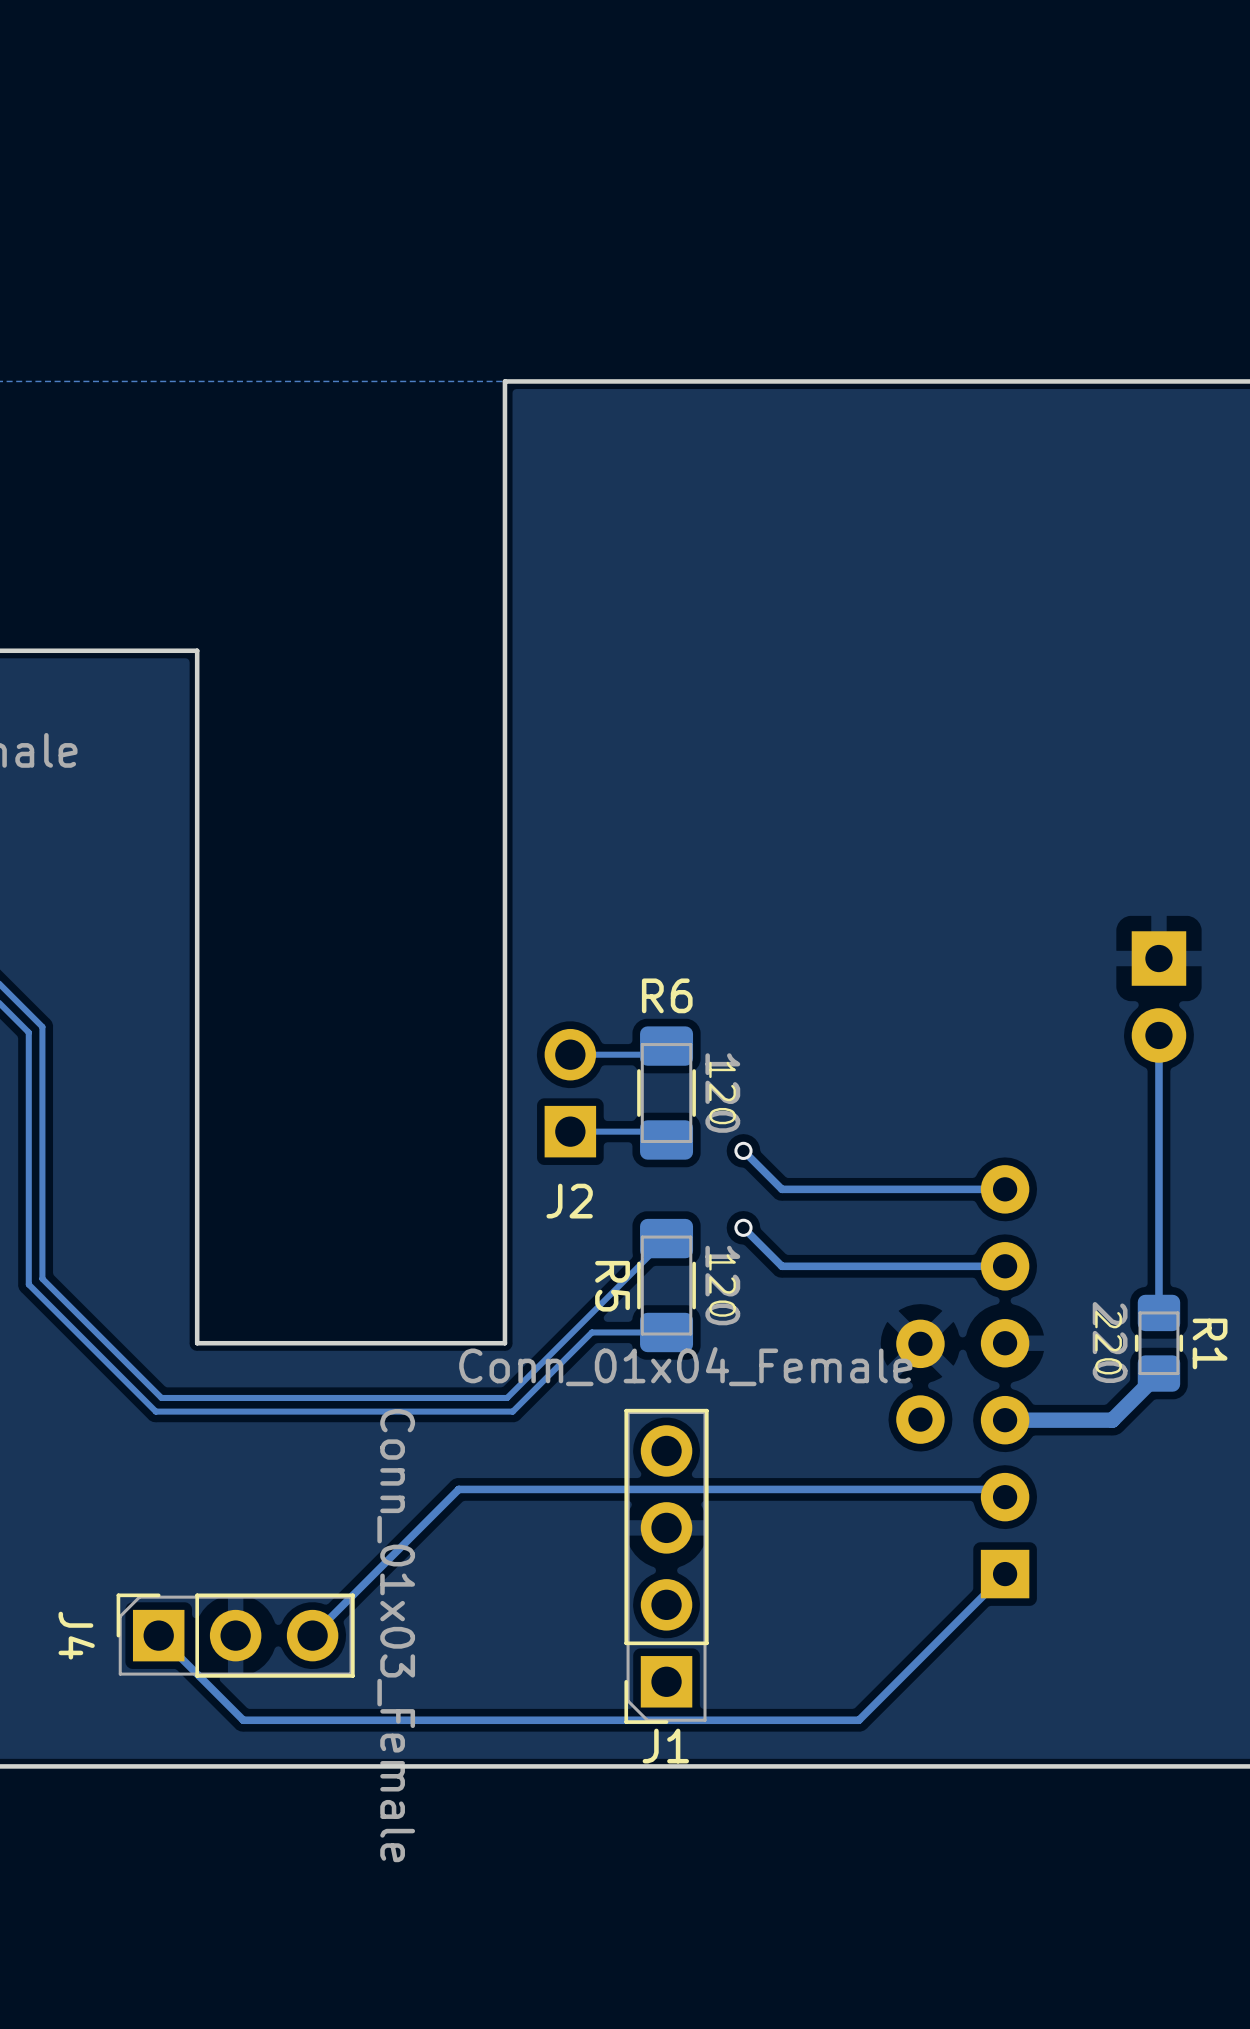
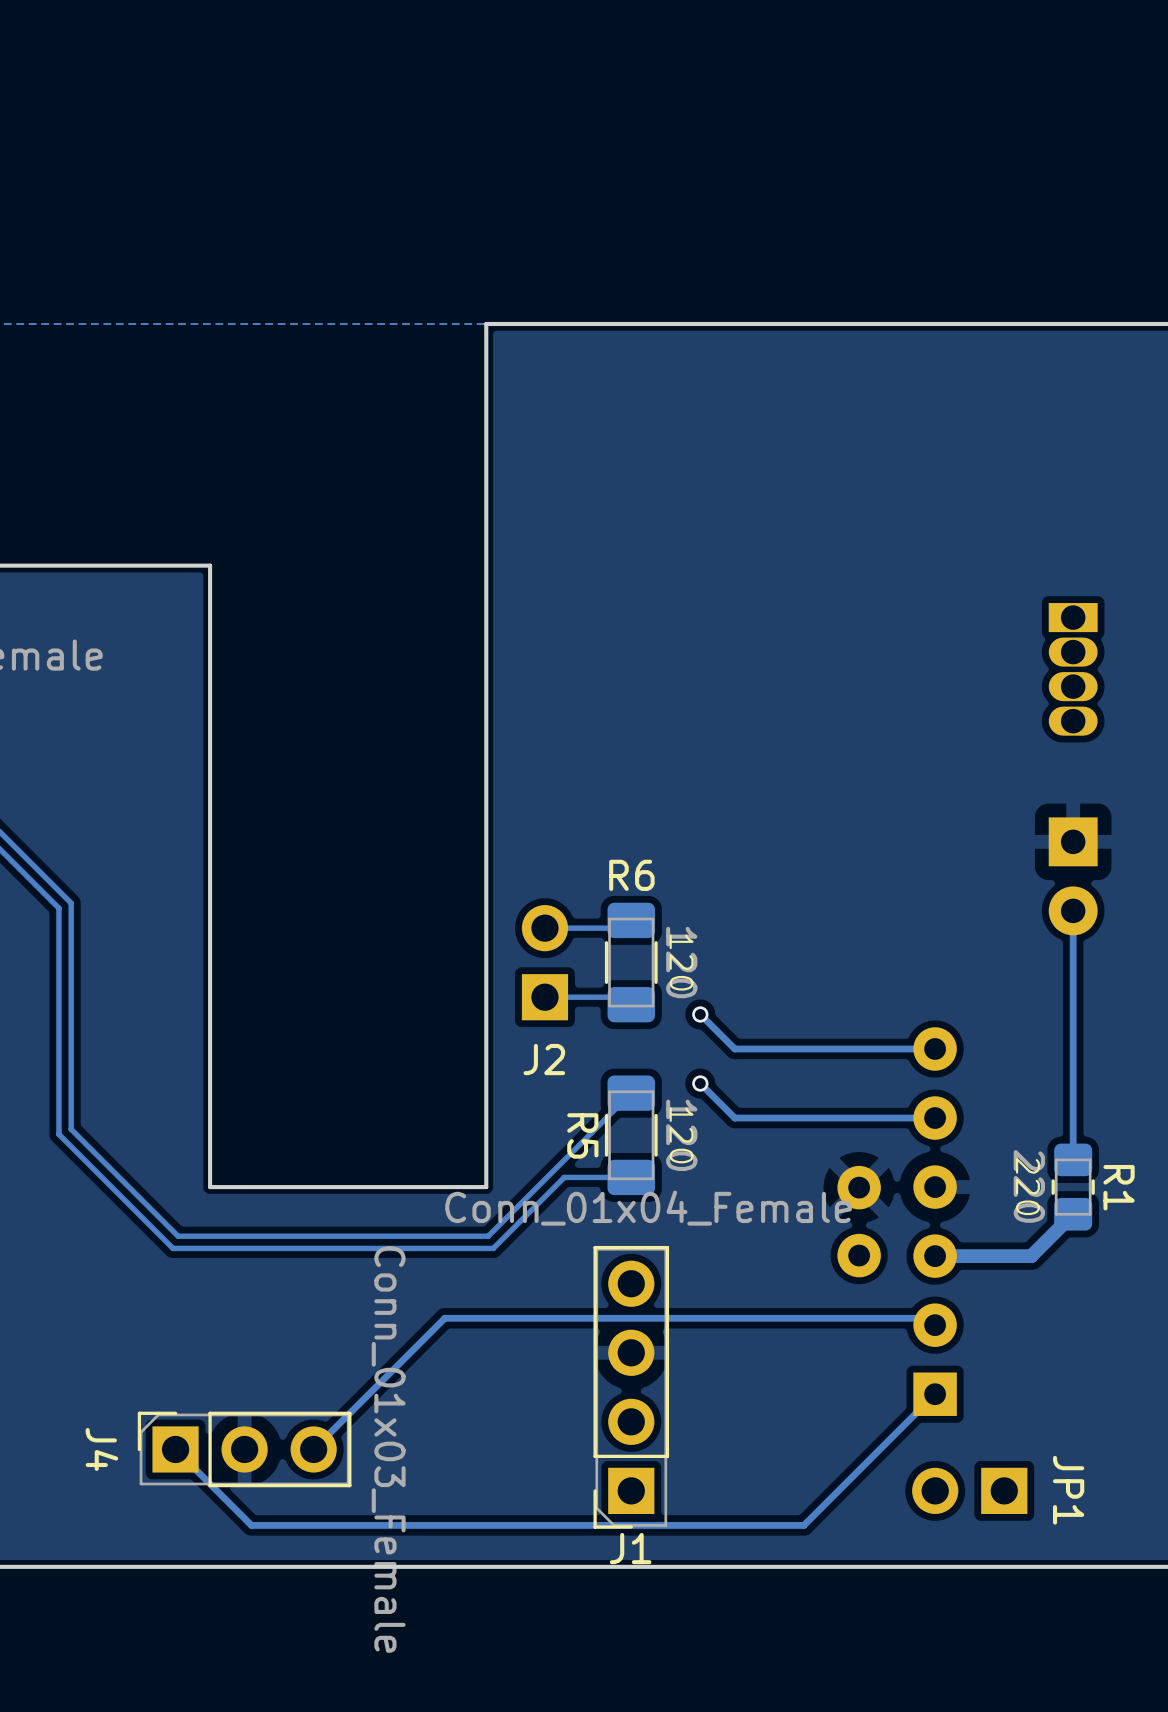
part: none -> (1073, 669)
JP1: none -> (969, 1490)

